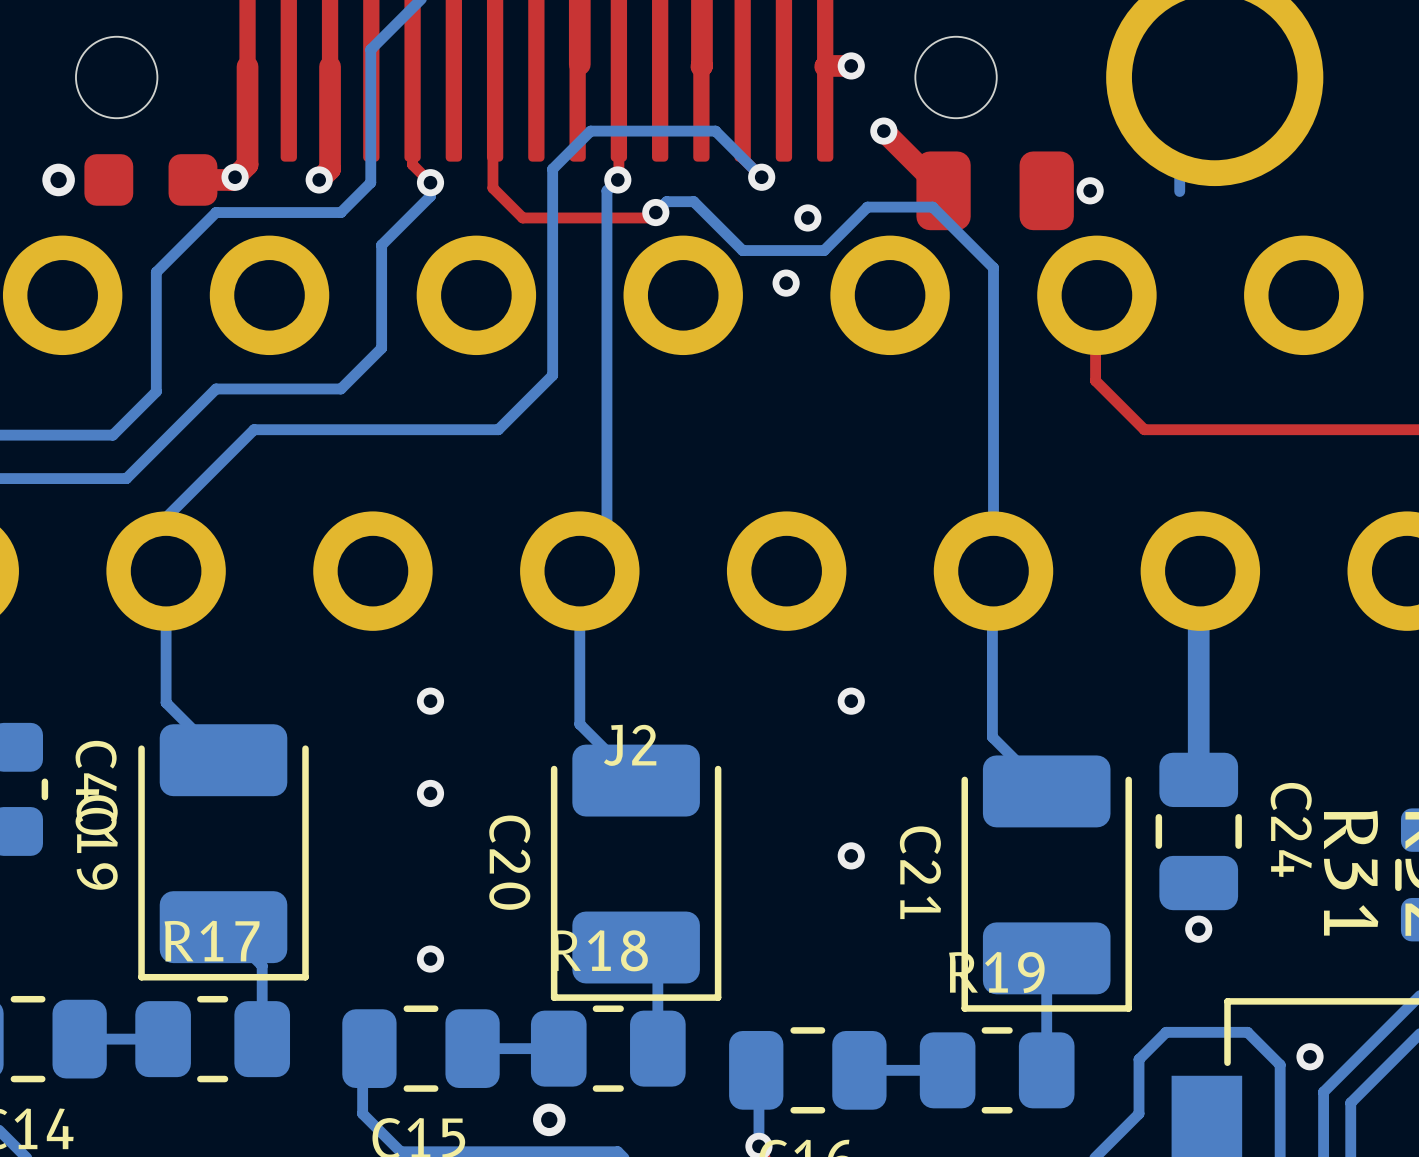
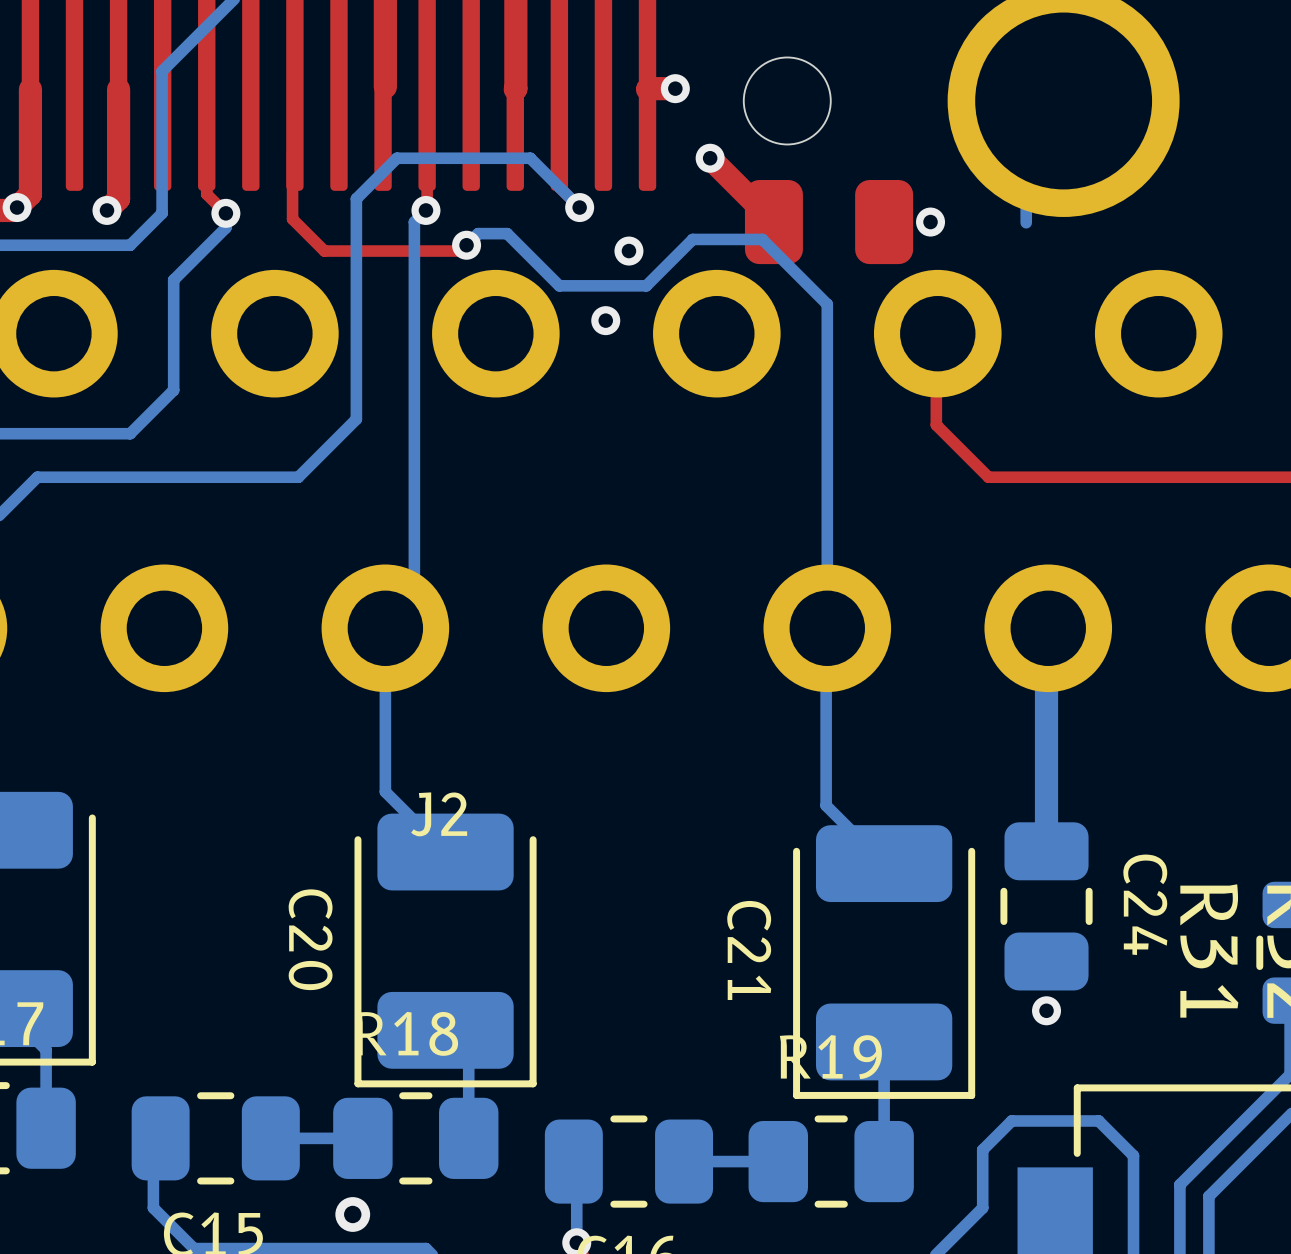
via: (430, 701) -> none
via: (851, 701) -> none
via: (430, 793) -> none
via: (851, 855) -> none
via: (430, 959) -> none
via: (1310, 1056) -> none

